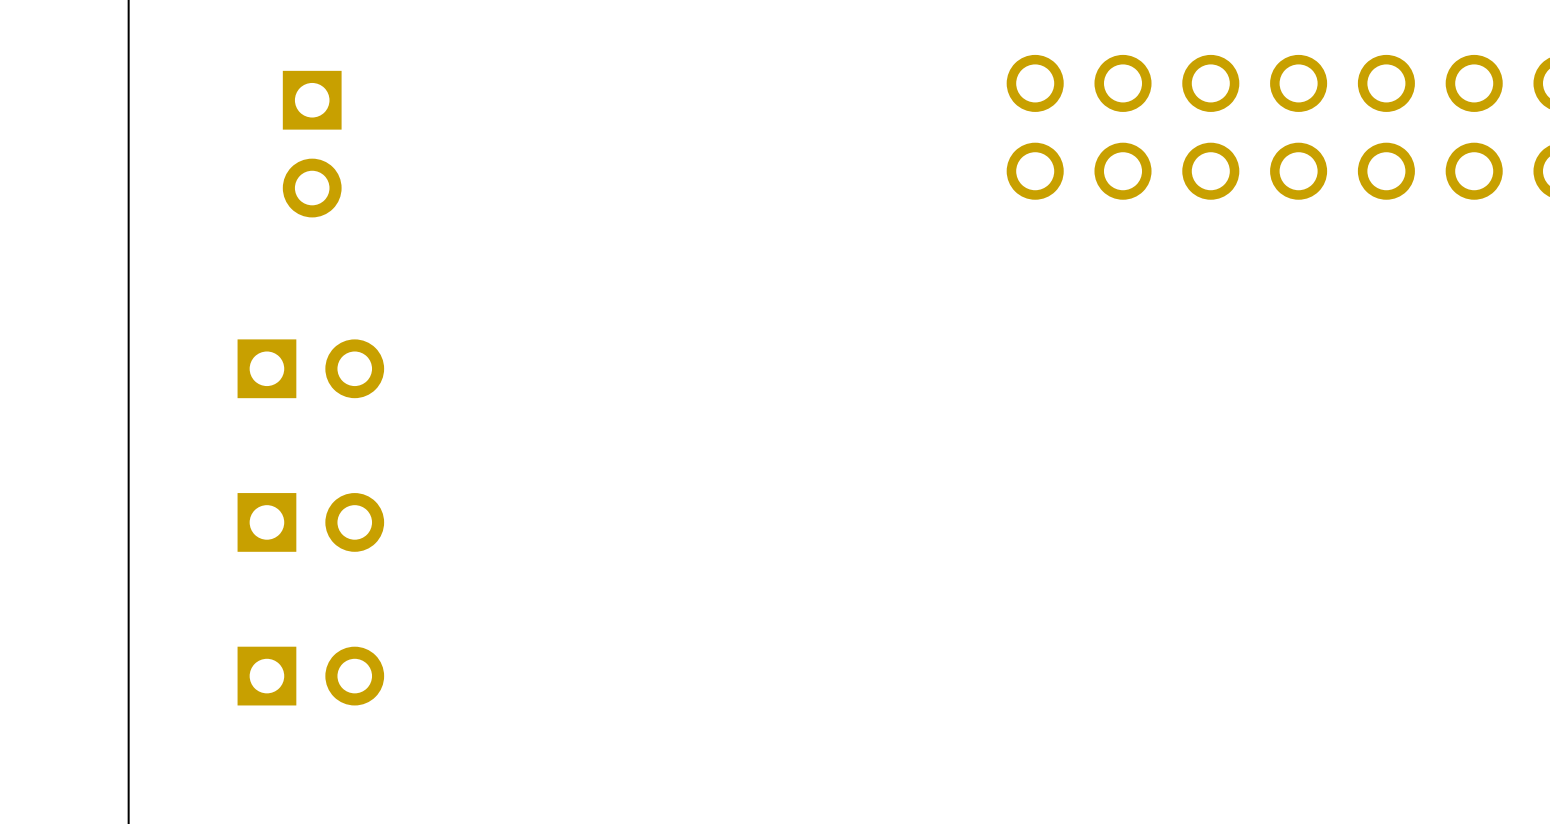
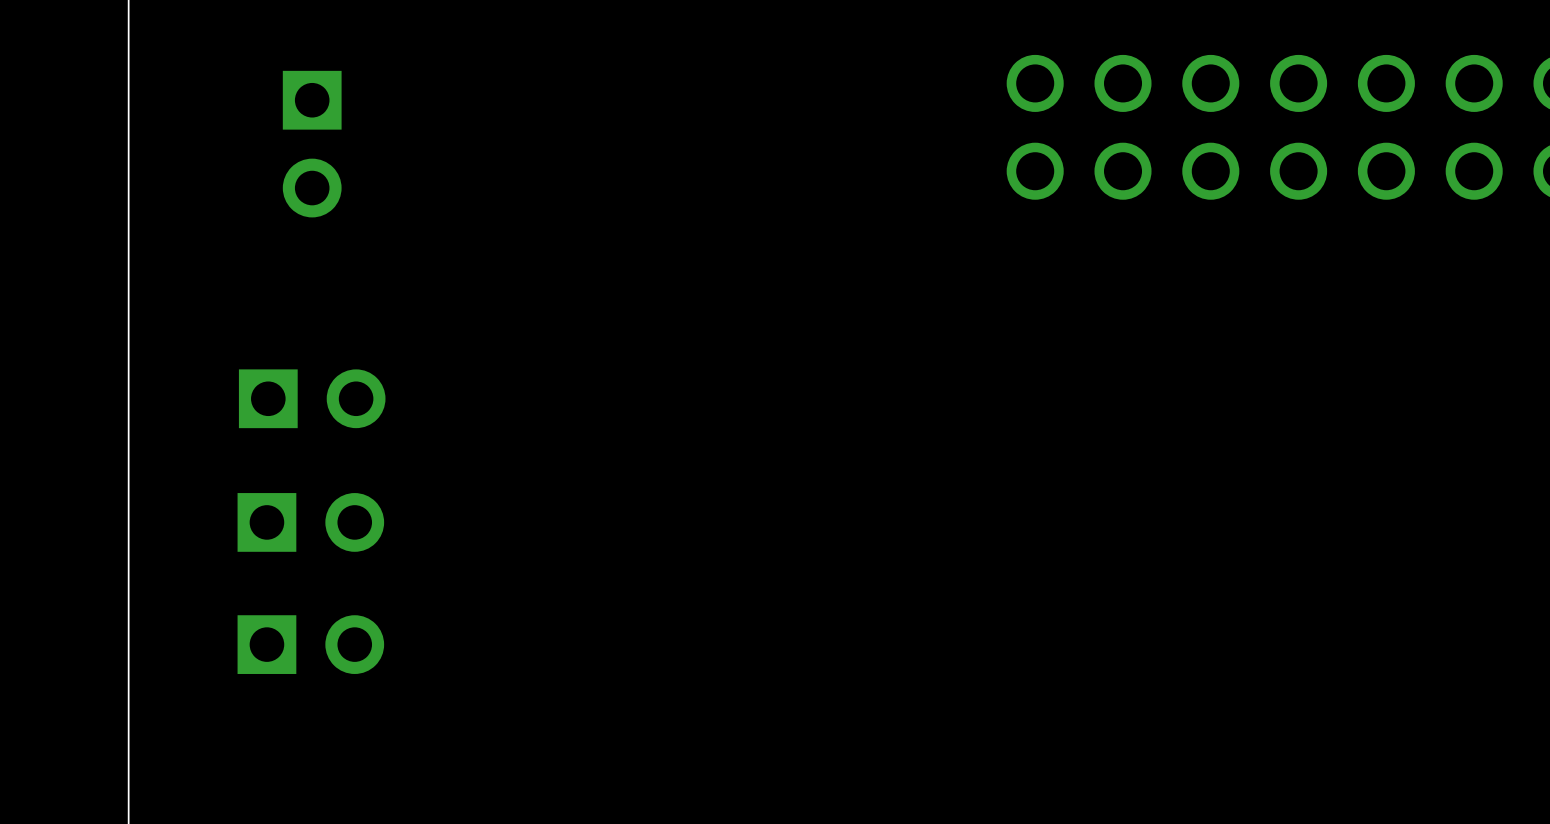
part position: (310, 368) -> (312, 398)
part position: (310, 676) -> (310, 644)

